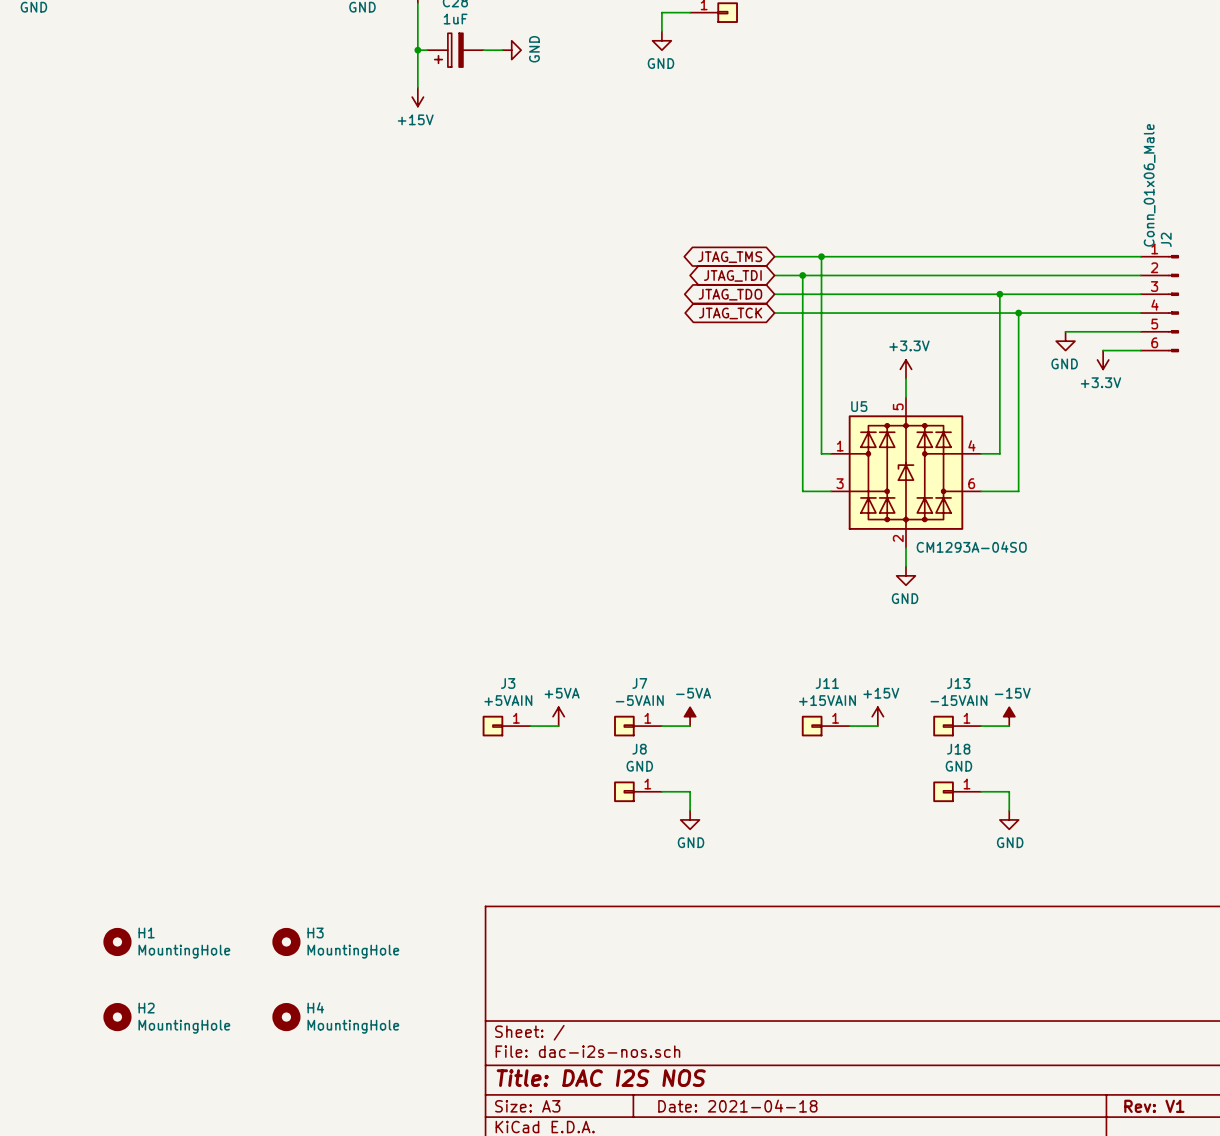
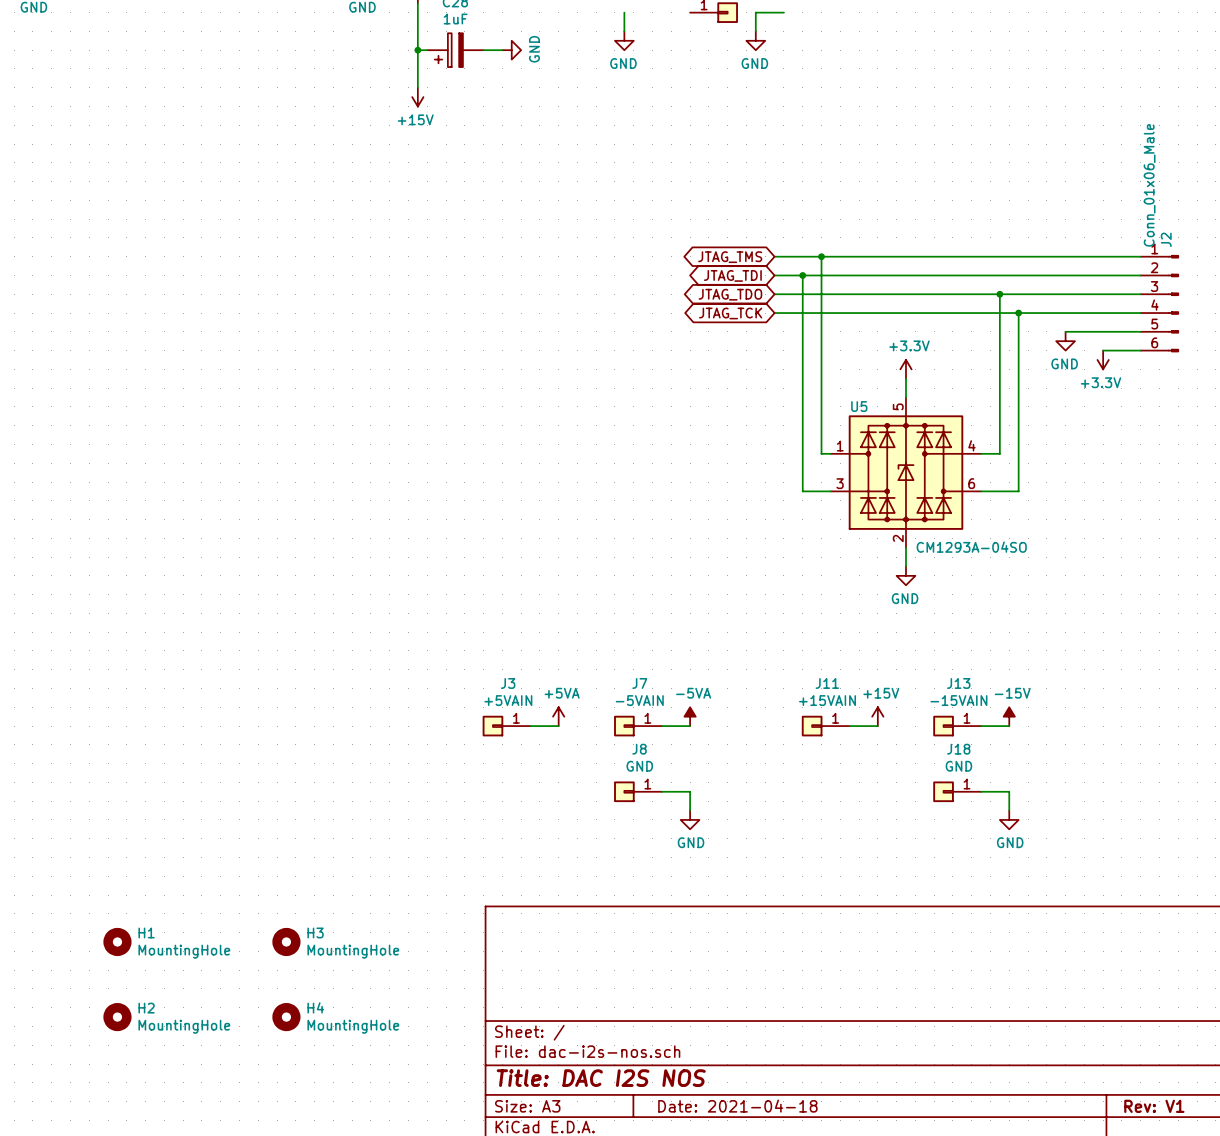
wire: none -> (624, 12) (624, 31)
wire: (690, 12) (661, 12) (661, 31) -> (783, 12) (755, 12) (755, 31)
power symbol position: GND (661, 40) -> GND (624, 40)
power symbol: none -> GND (755, 40)

